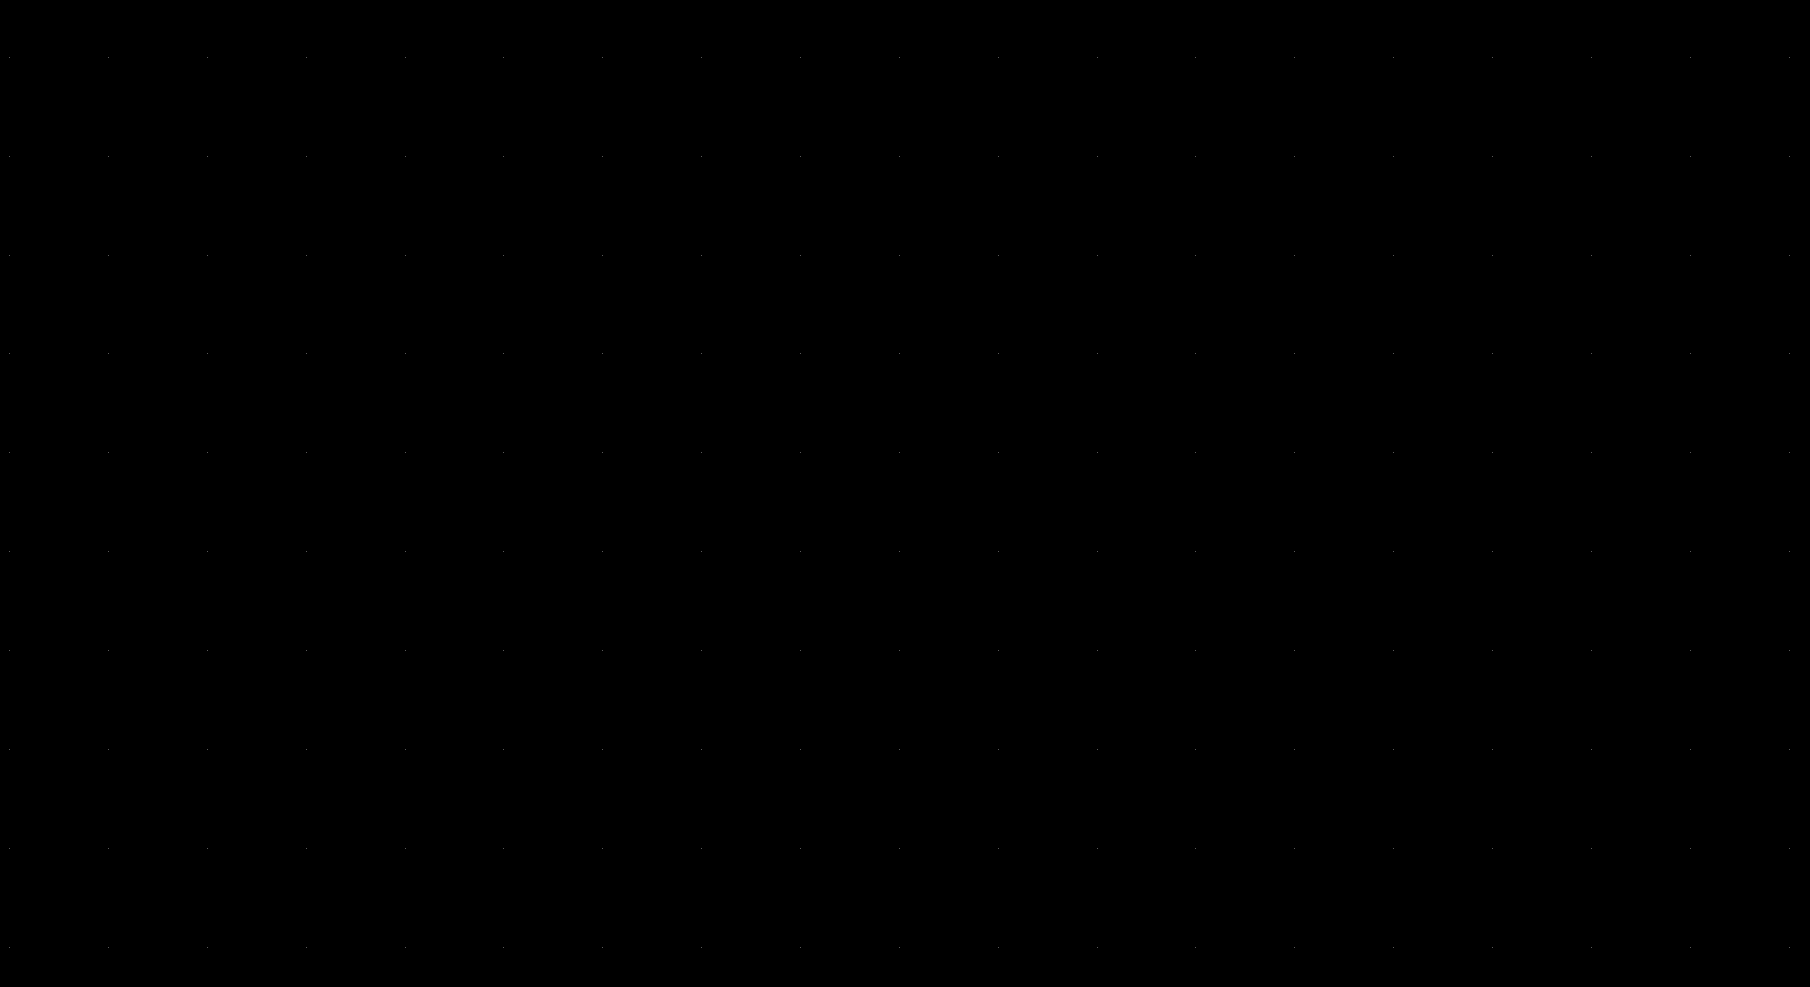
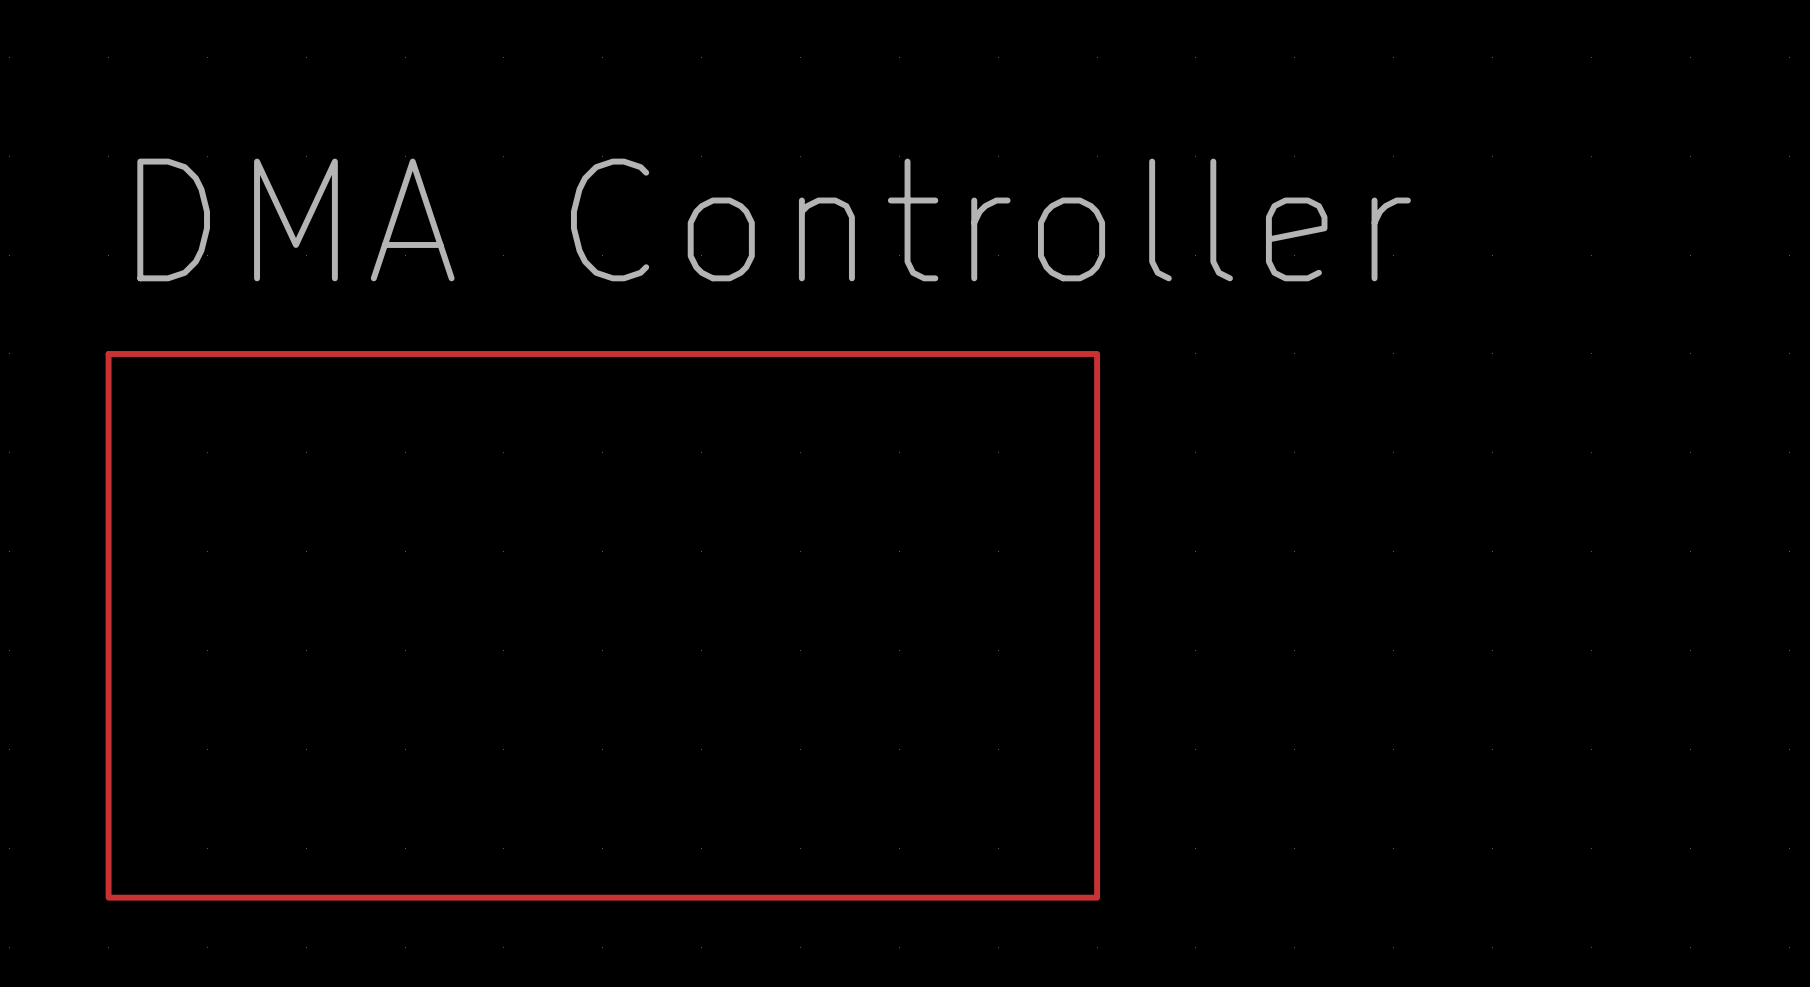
sheet DMA Controller: none -> (602, 625)

